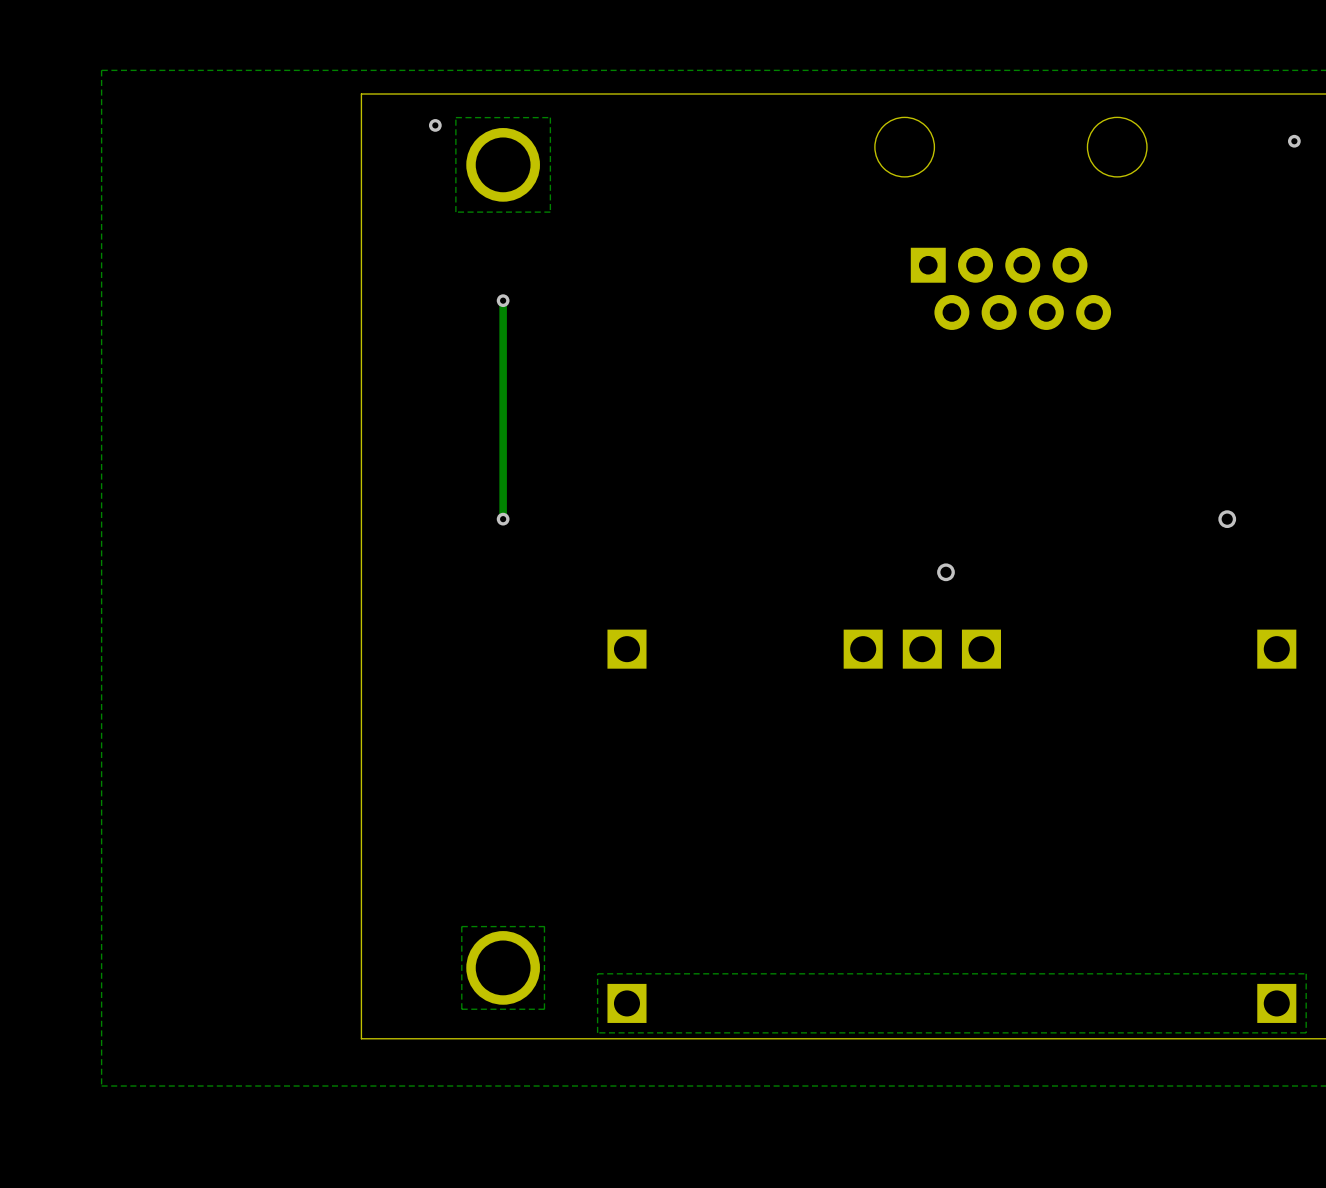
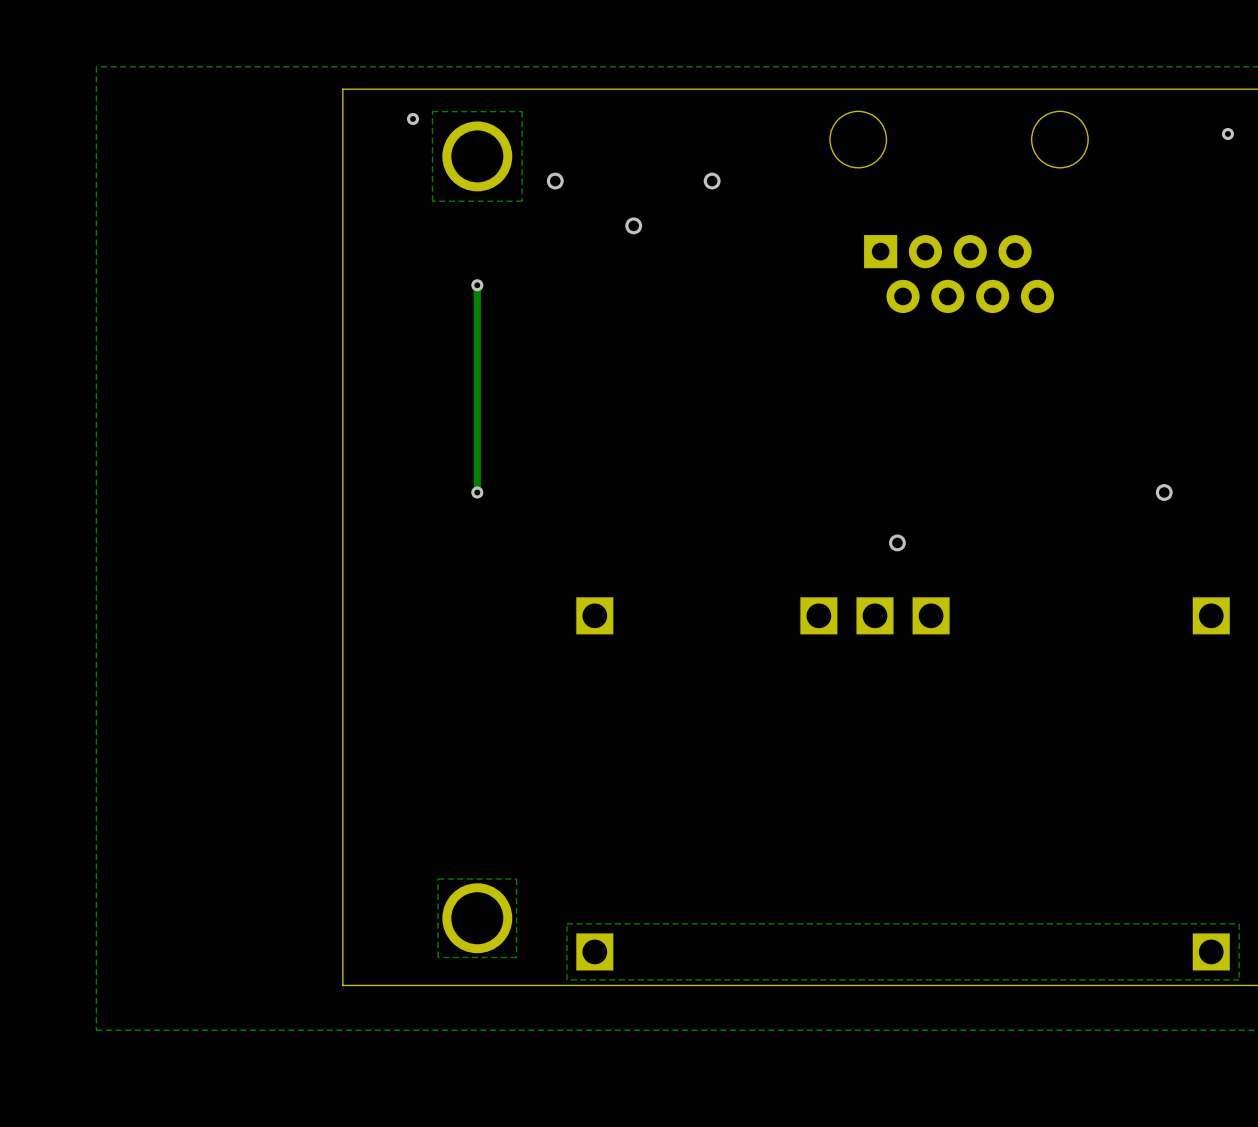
via: none -> (555, 181)
via: none -> (712, 181)
via: none -> (633, 225)

